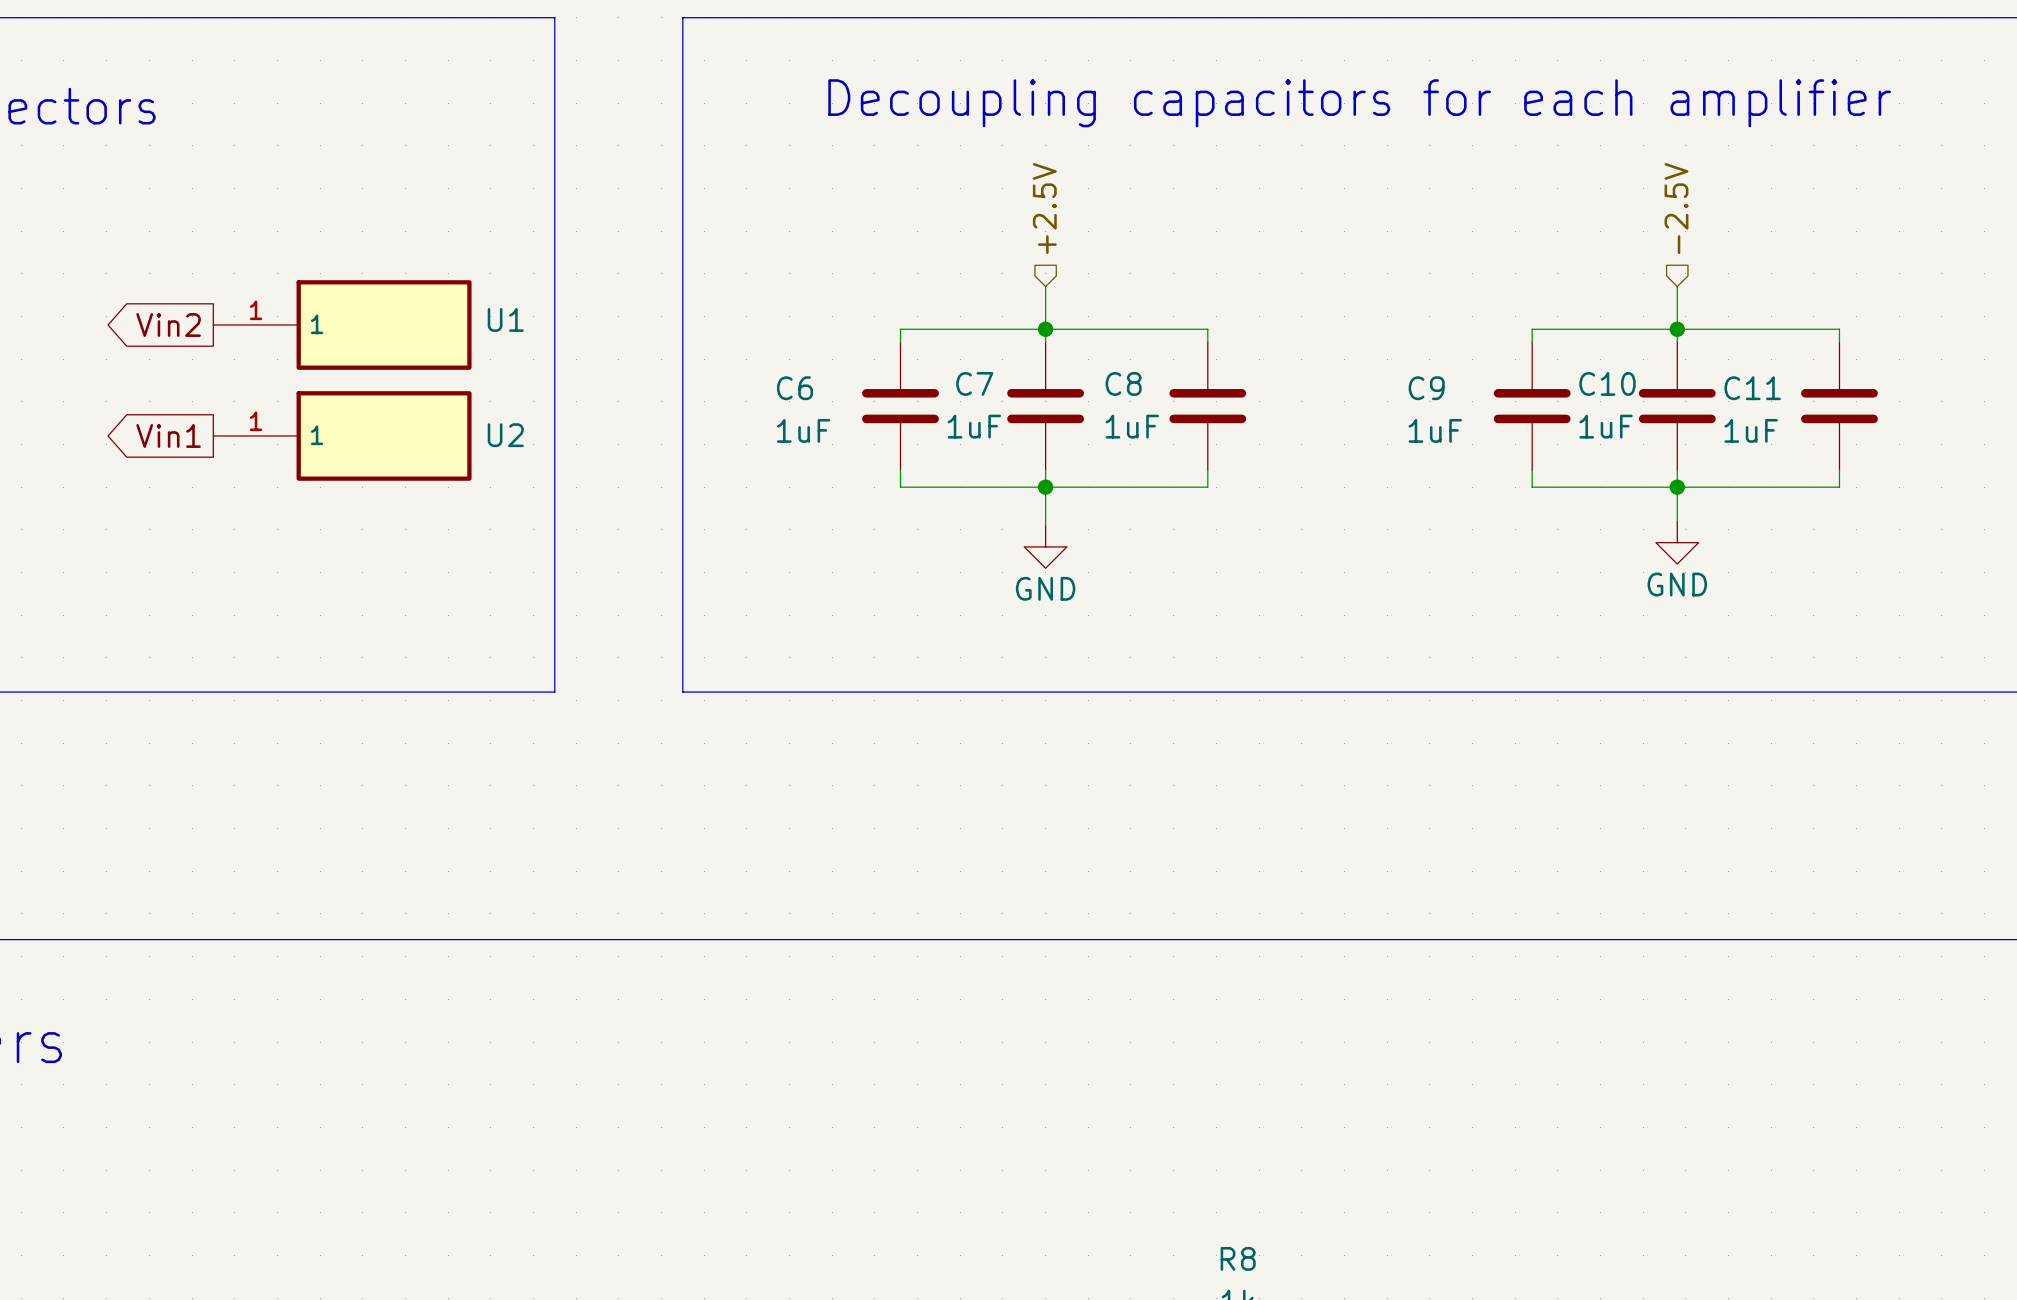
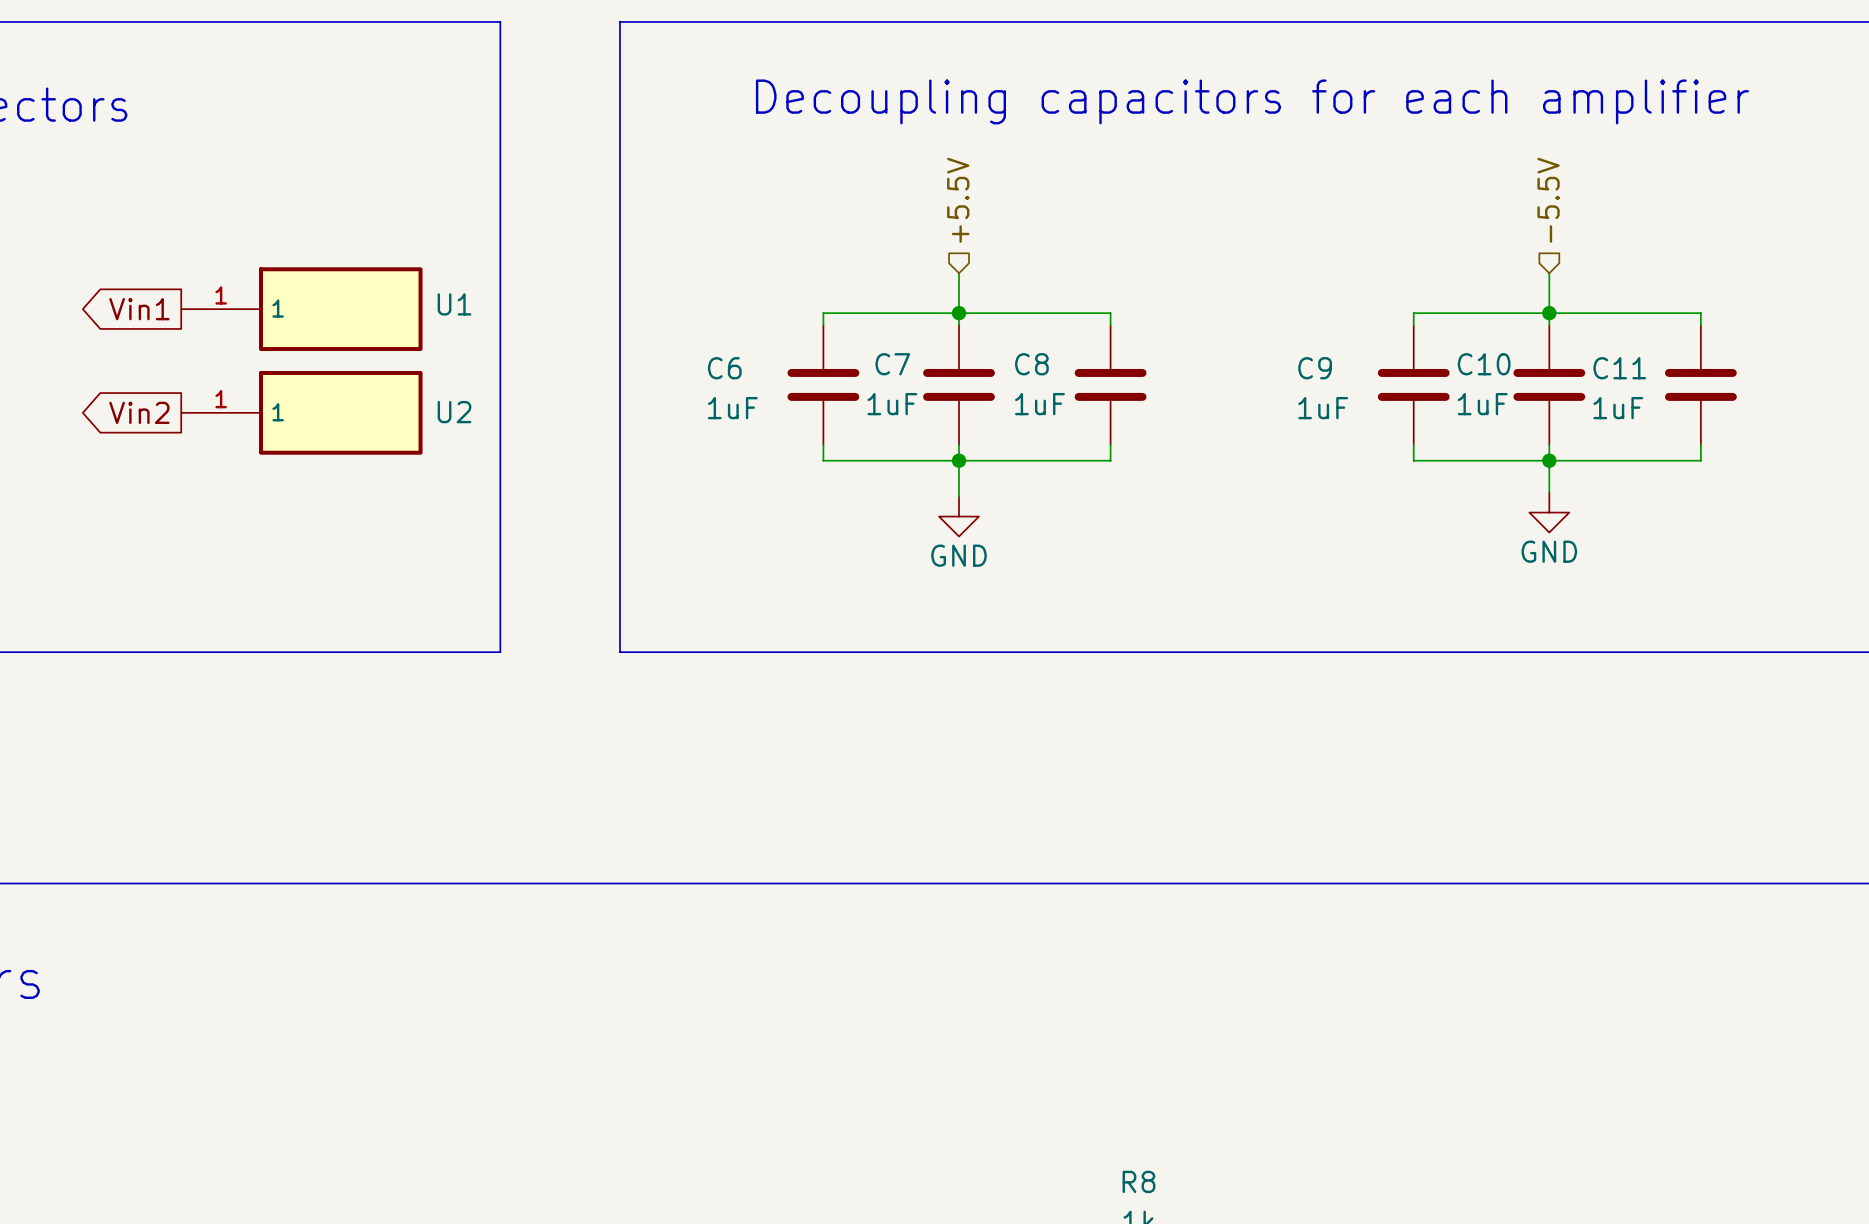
hierarchical label: +2.5V (1044, 208) -> +5.5V (958, 200)
hierarchical label: -2.5V (1676, 208) -> -5.5V (1548, 200)
global label: Vin2 (168, 325) -> Vin1 (139, 309)
global label: Vin1 (168, 435) -> Vin2 (139, 412)

